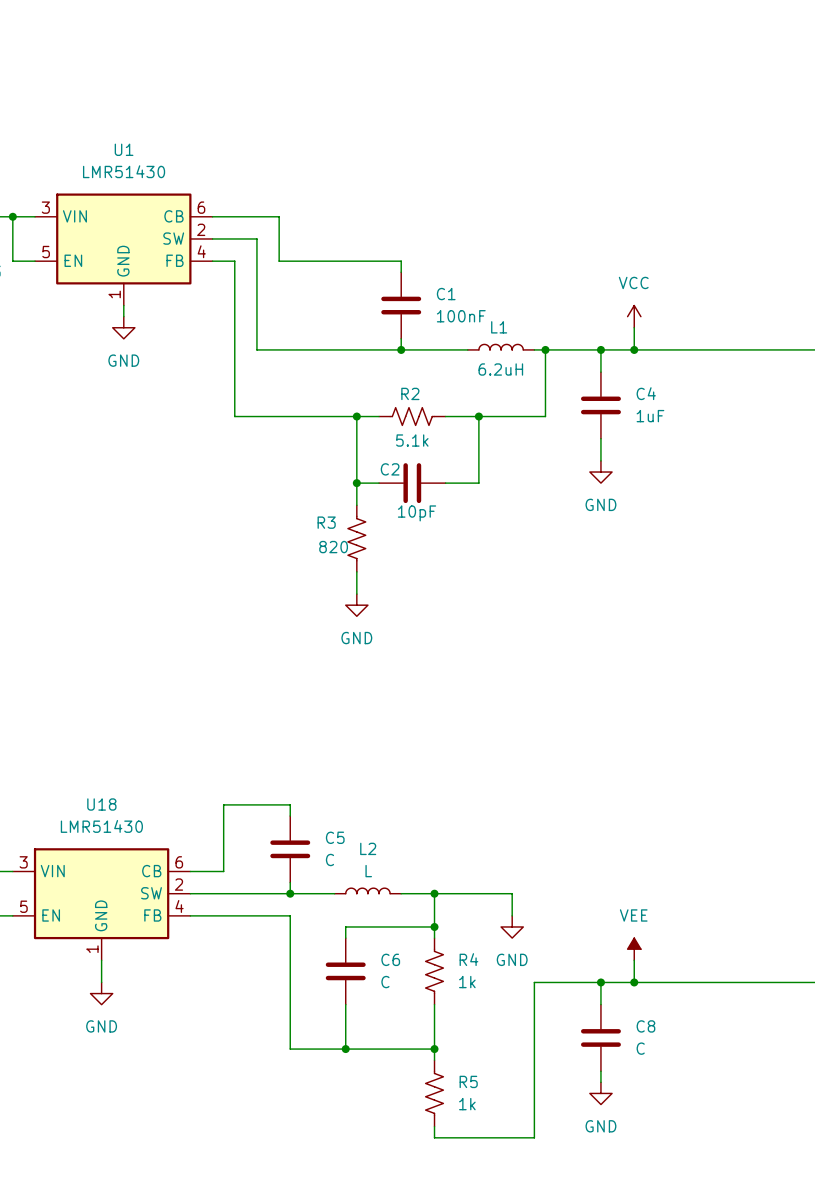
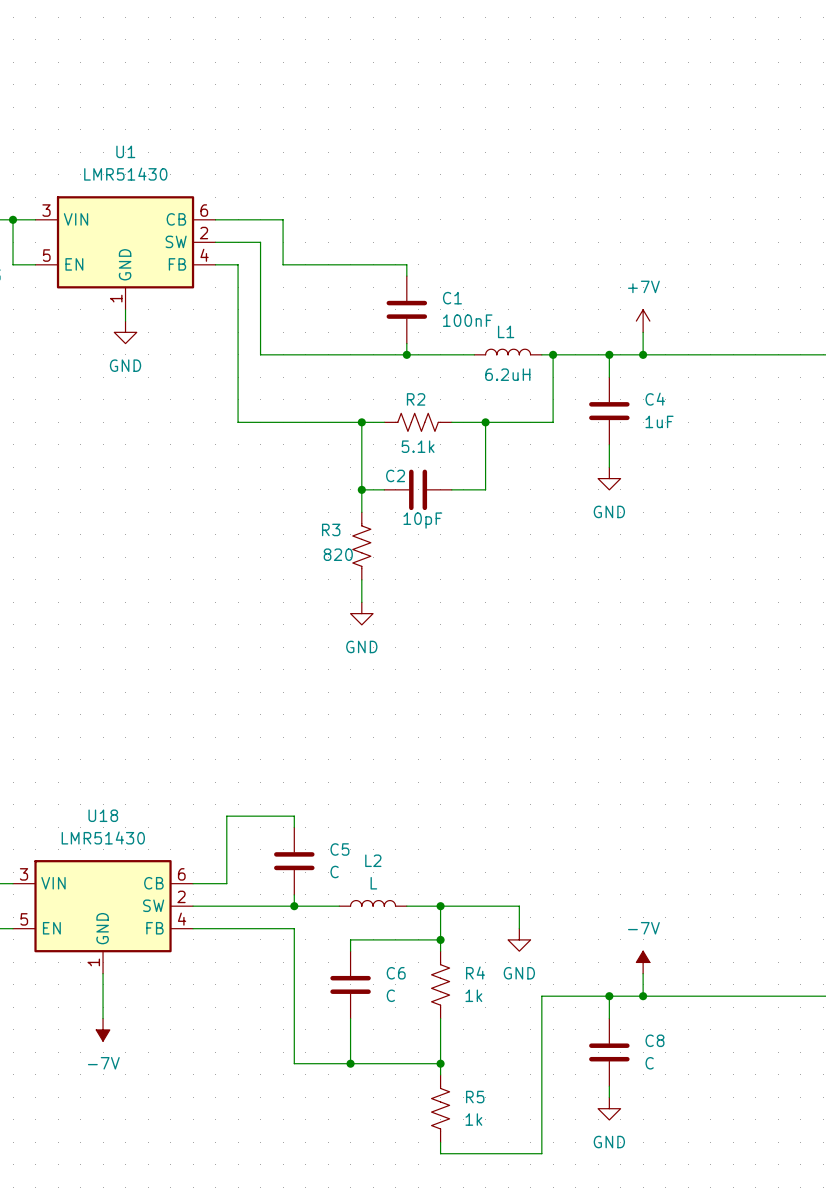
power symbol: VCC (634, 316) -> +7V (643, 321)
power symbol: VEE (634, 949) -> -7V (643, 962)
power symbol: GND (101, 993) -> none
power symbol: none -> -7V (103, 1029)

